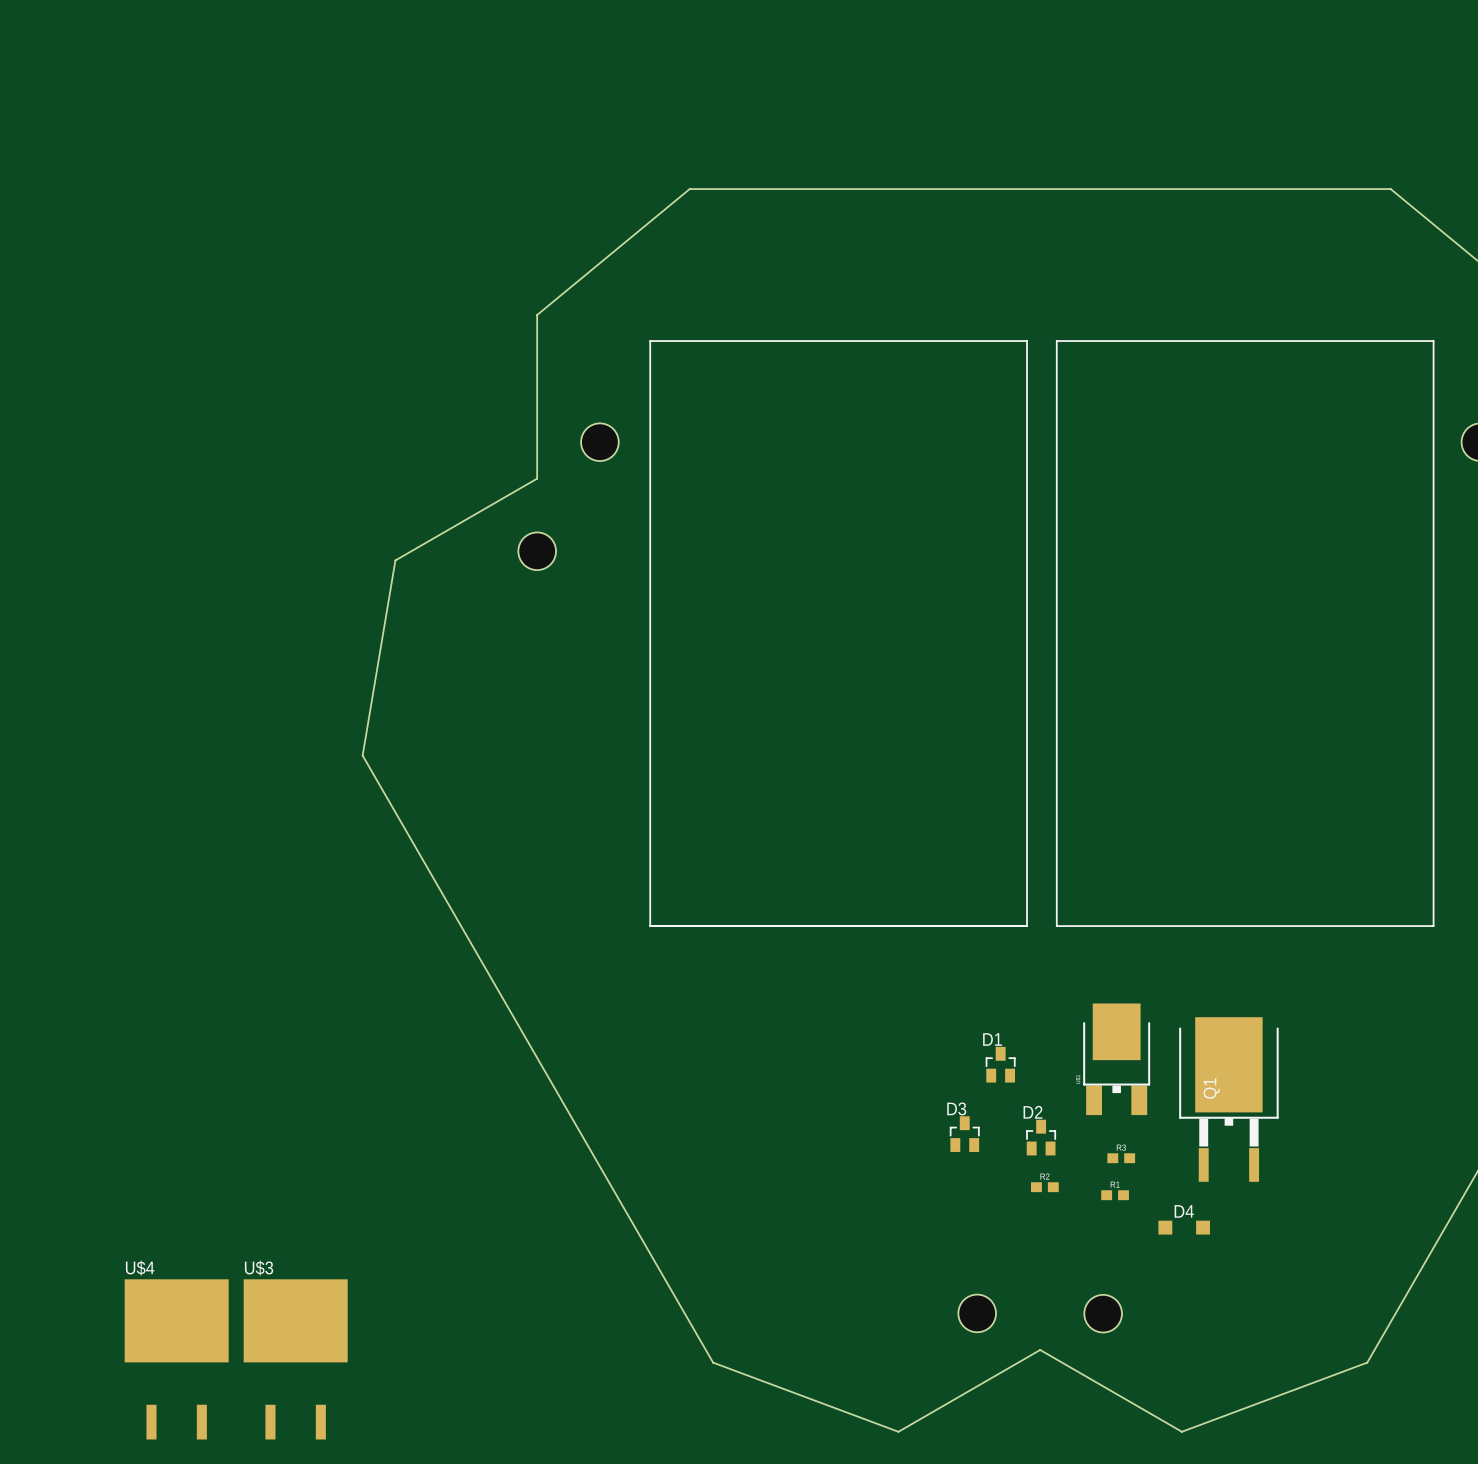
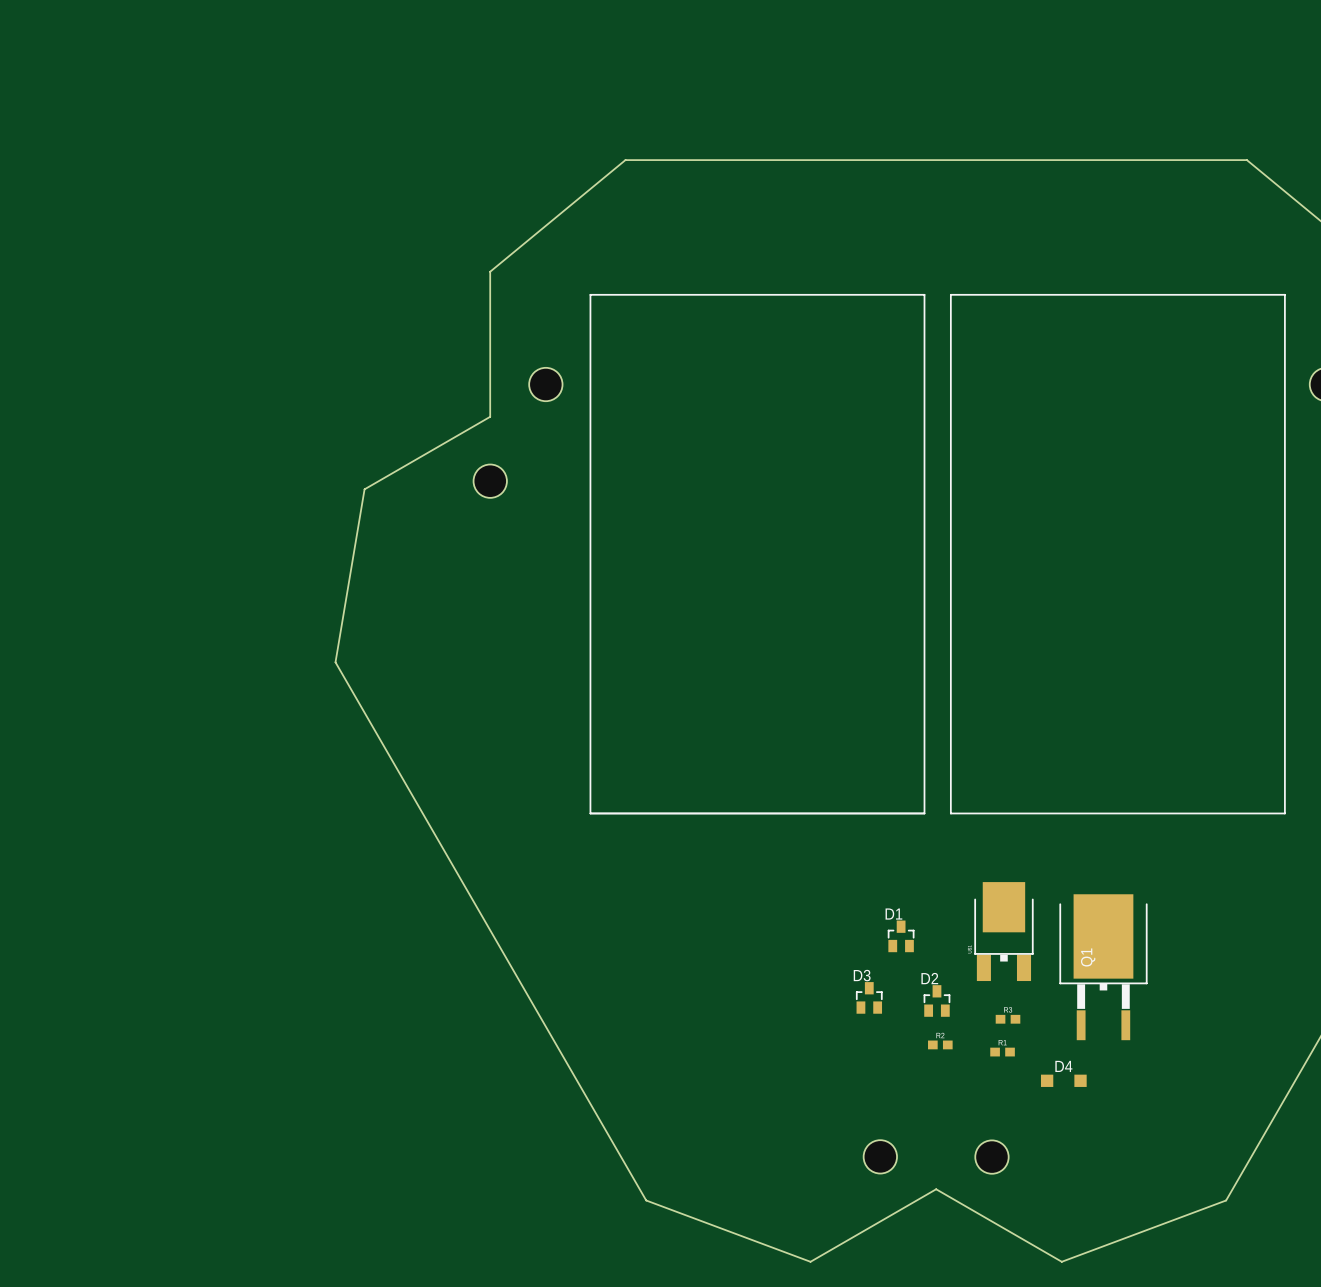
U$4: (176, 1359) -> none
U$3: (295, 1359) -> none

